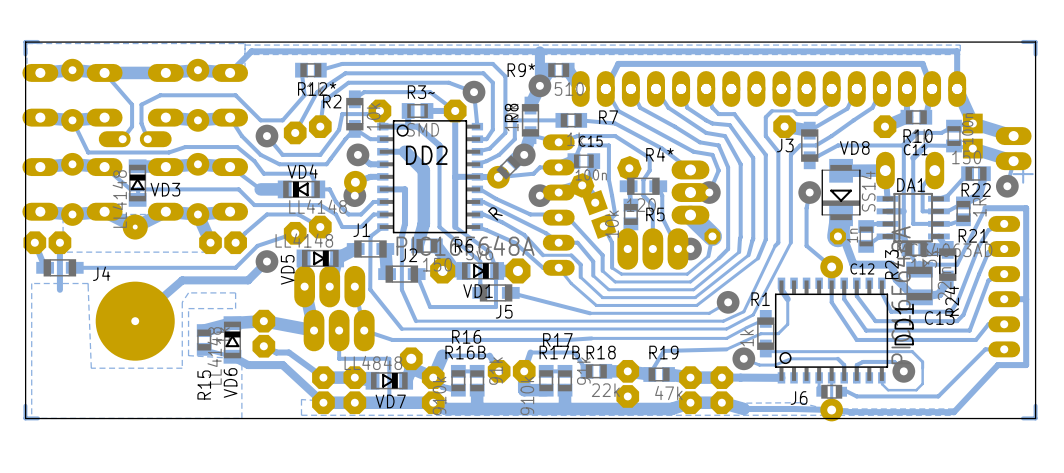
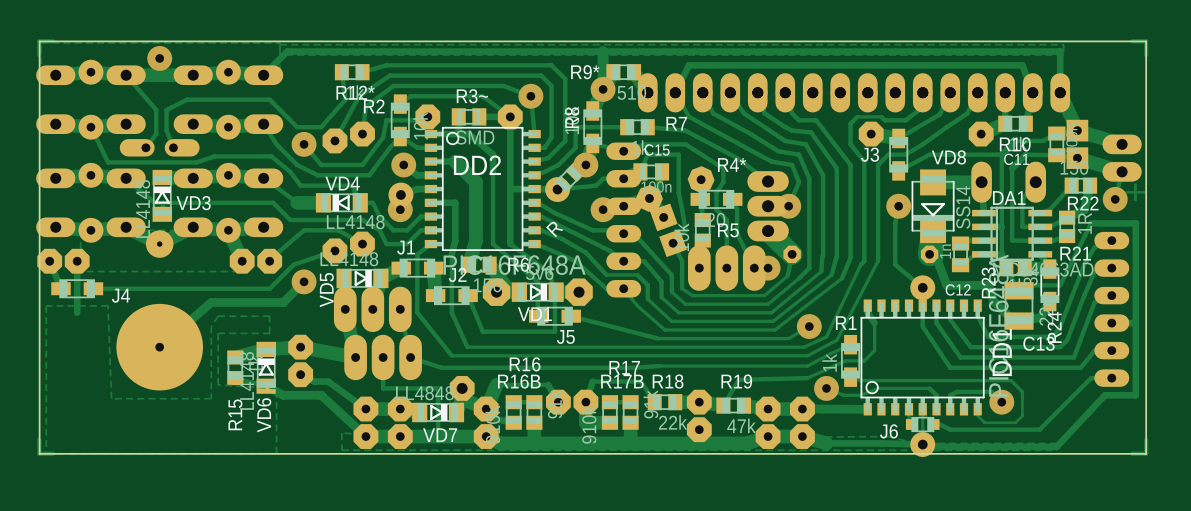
via: none -> (159, 58)

